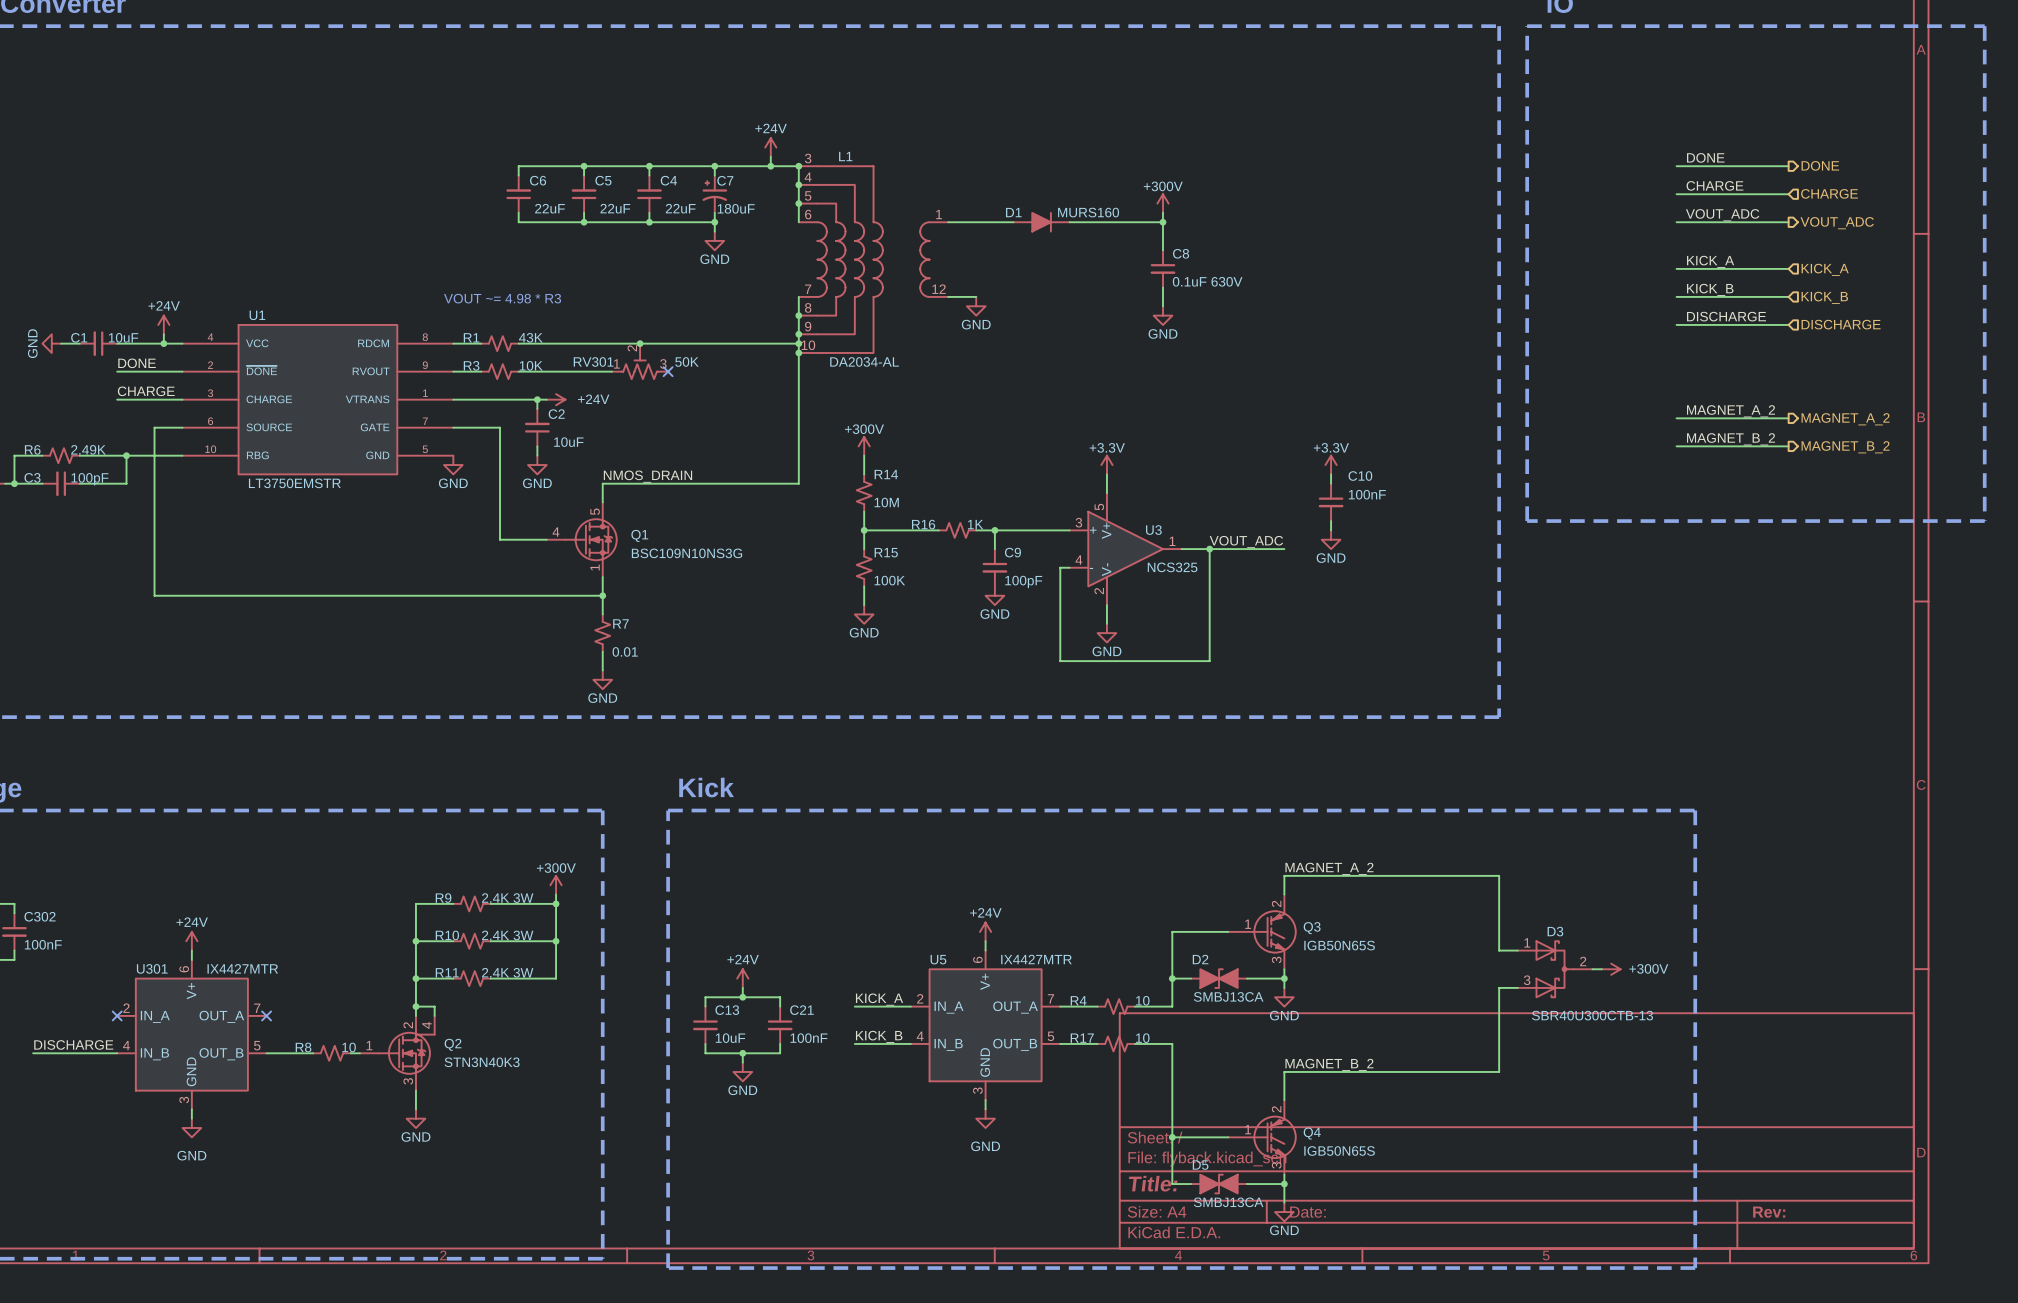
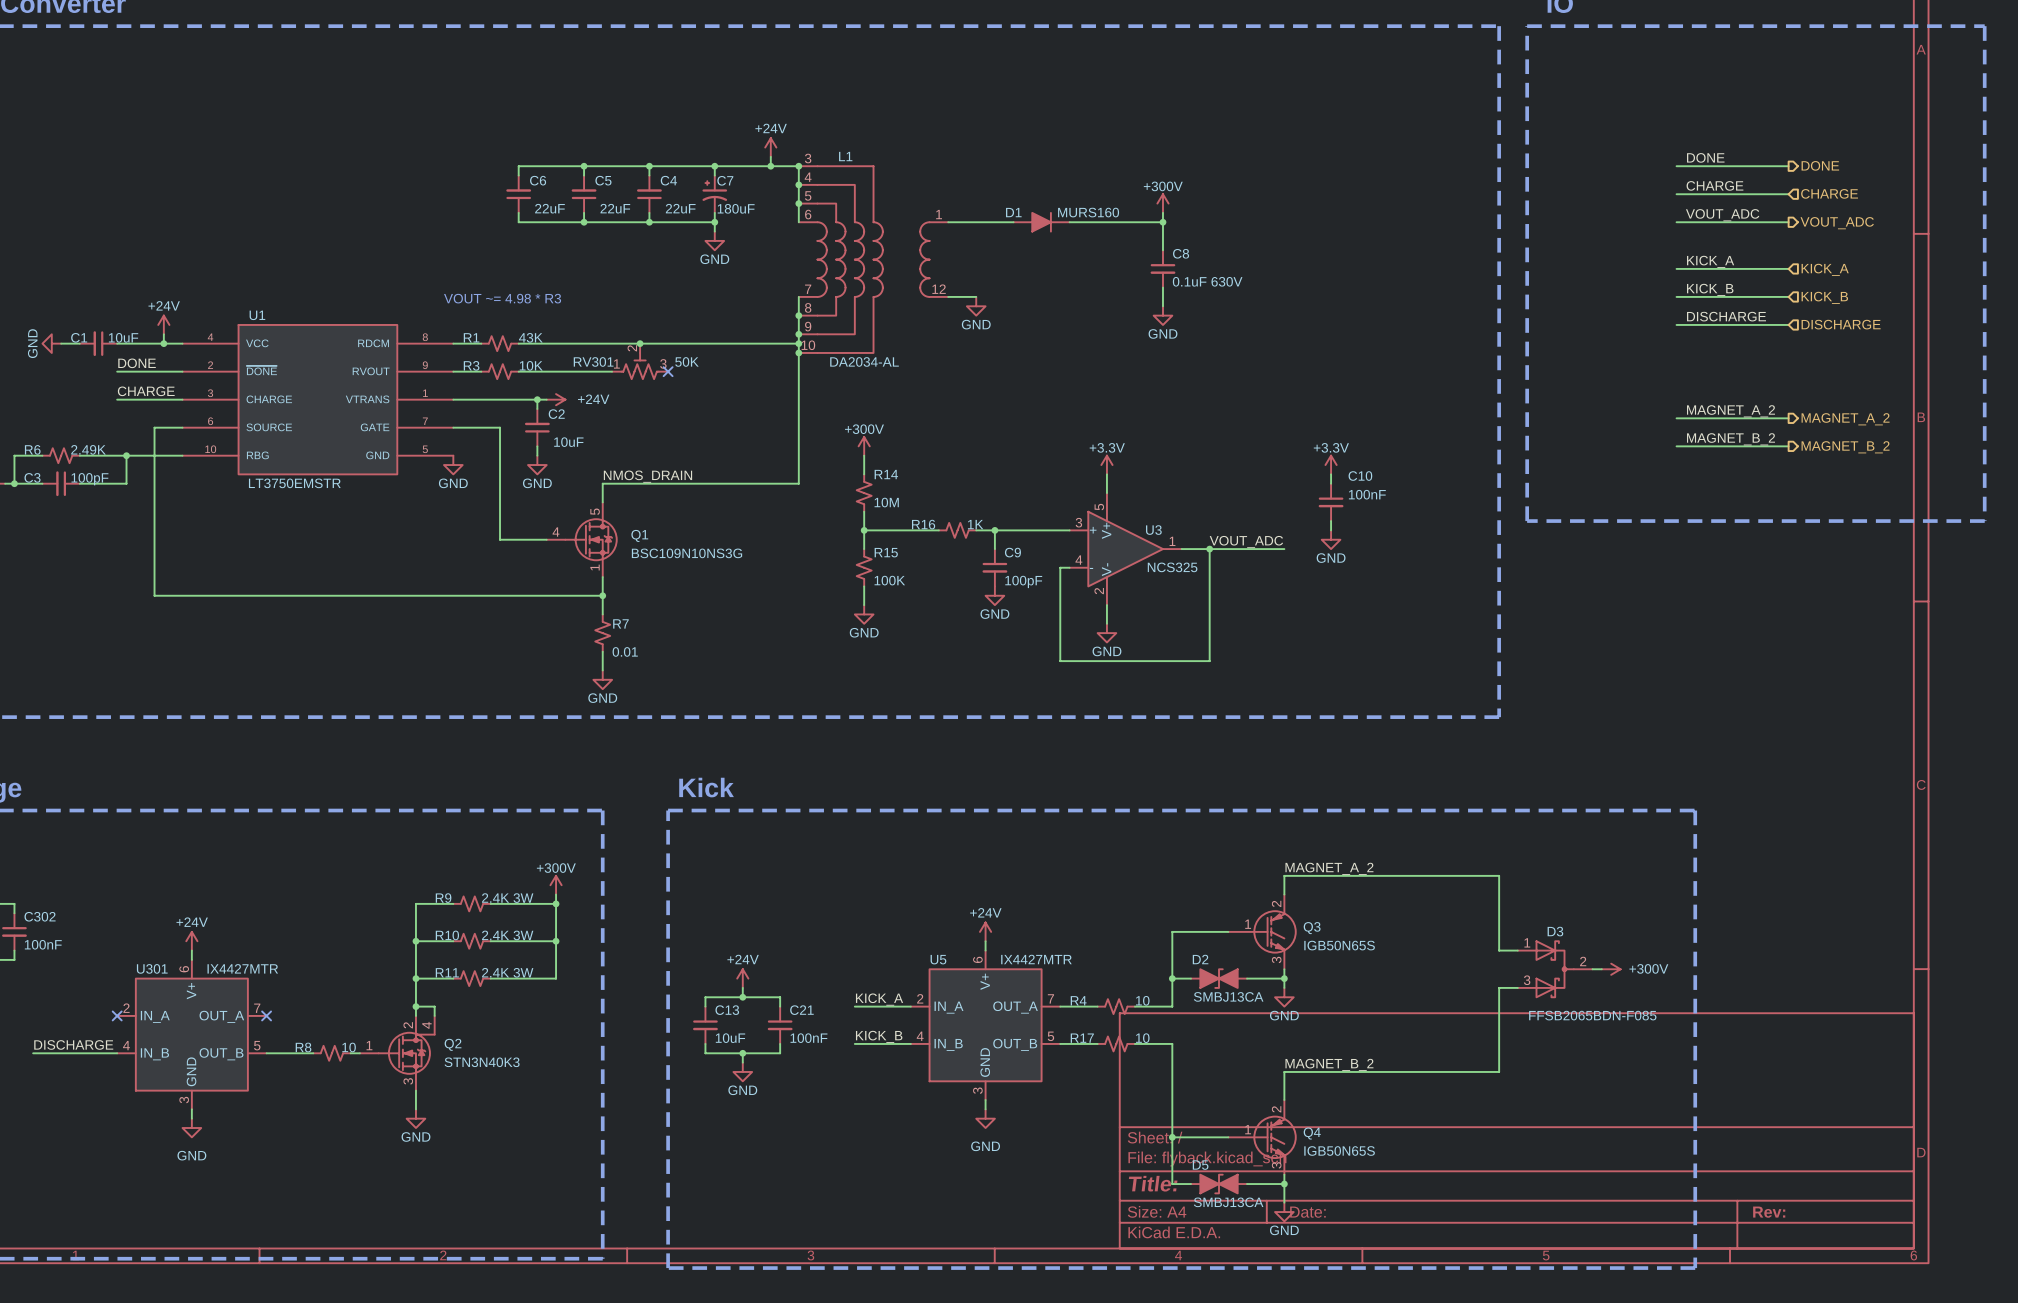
D3 value: SBR40U300CTB-13 (1592, 1015) -> FFSB2065BDN-F085 (1592, 1015)

